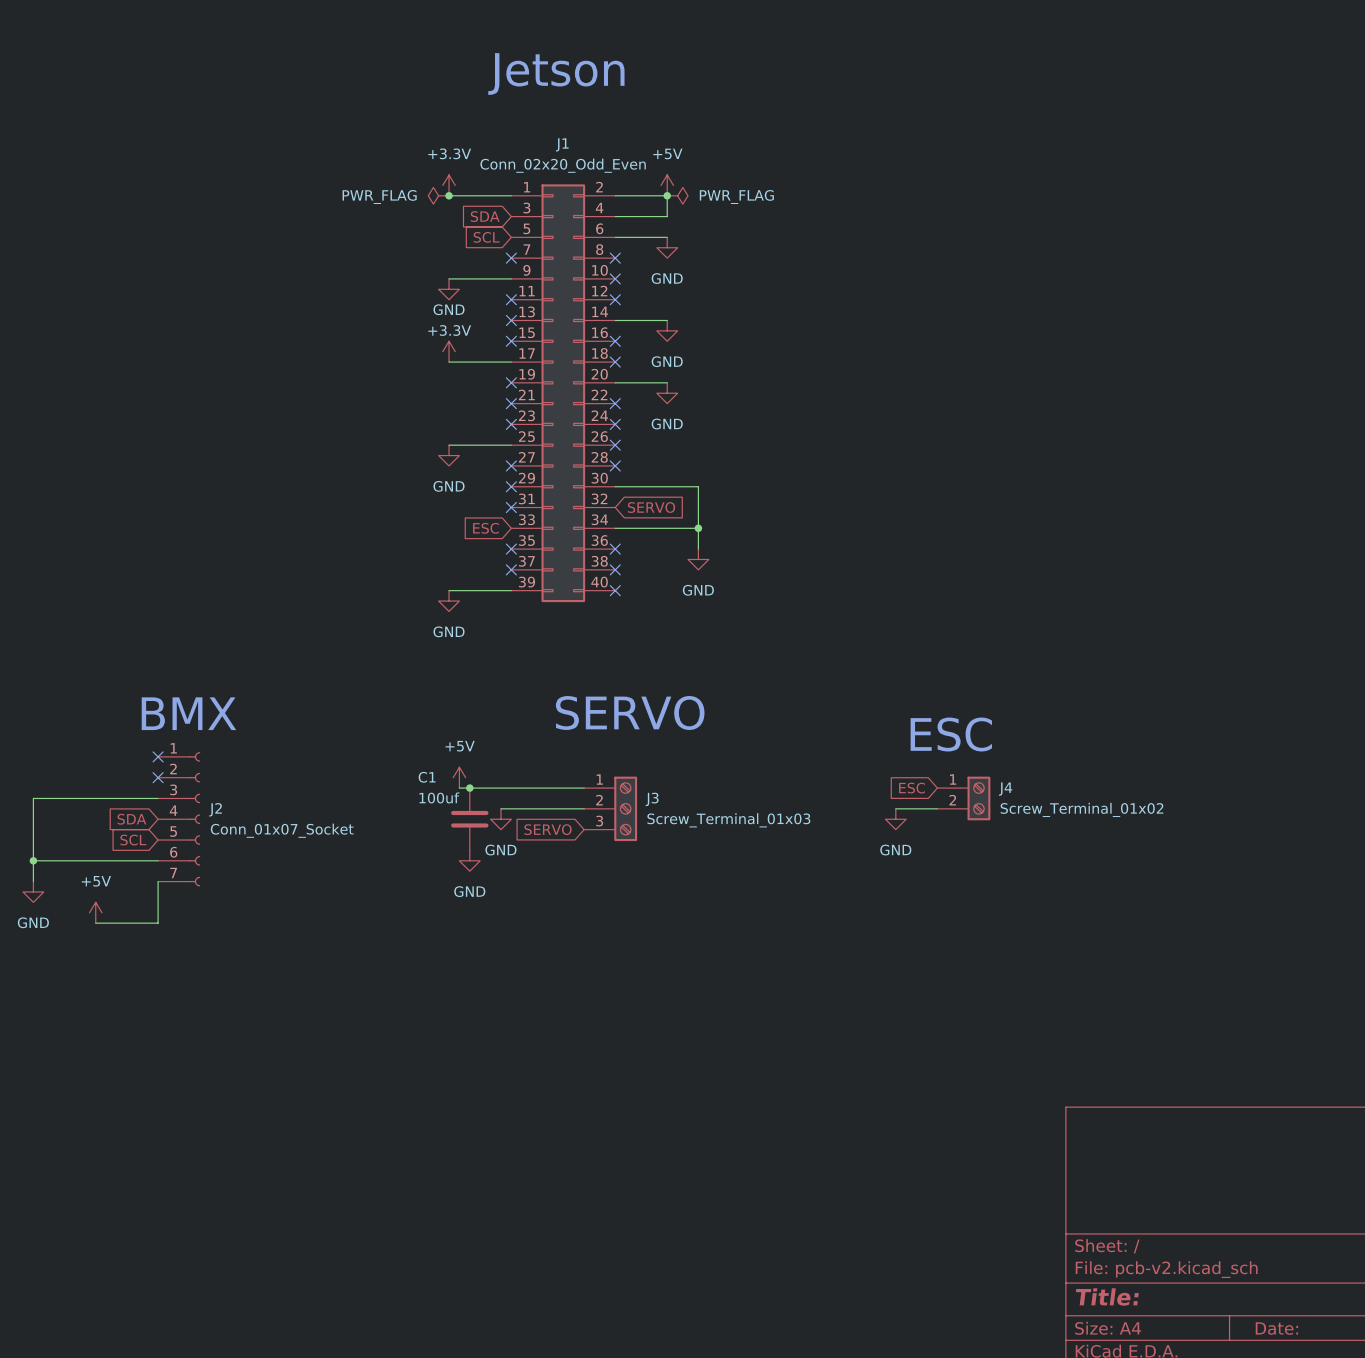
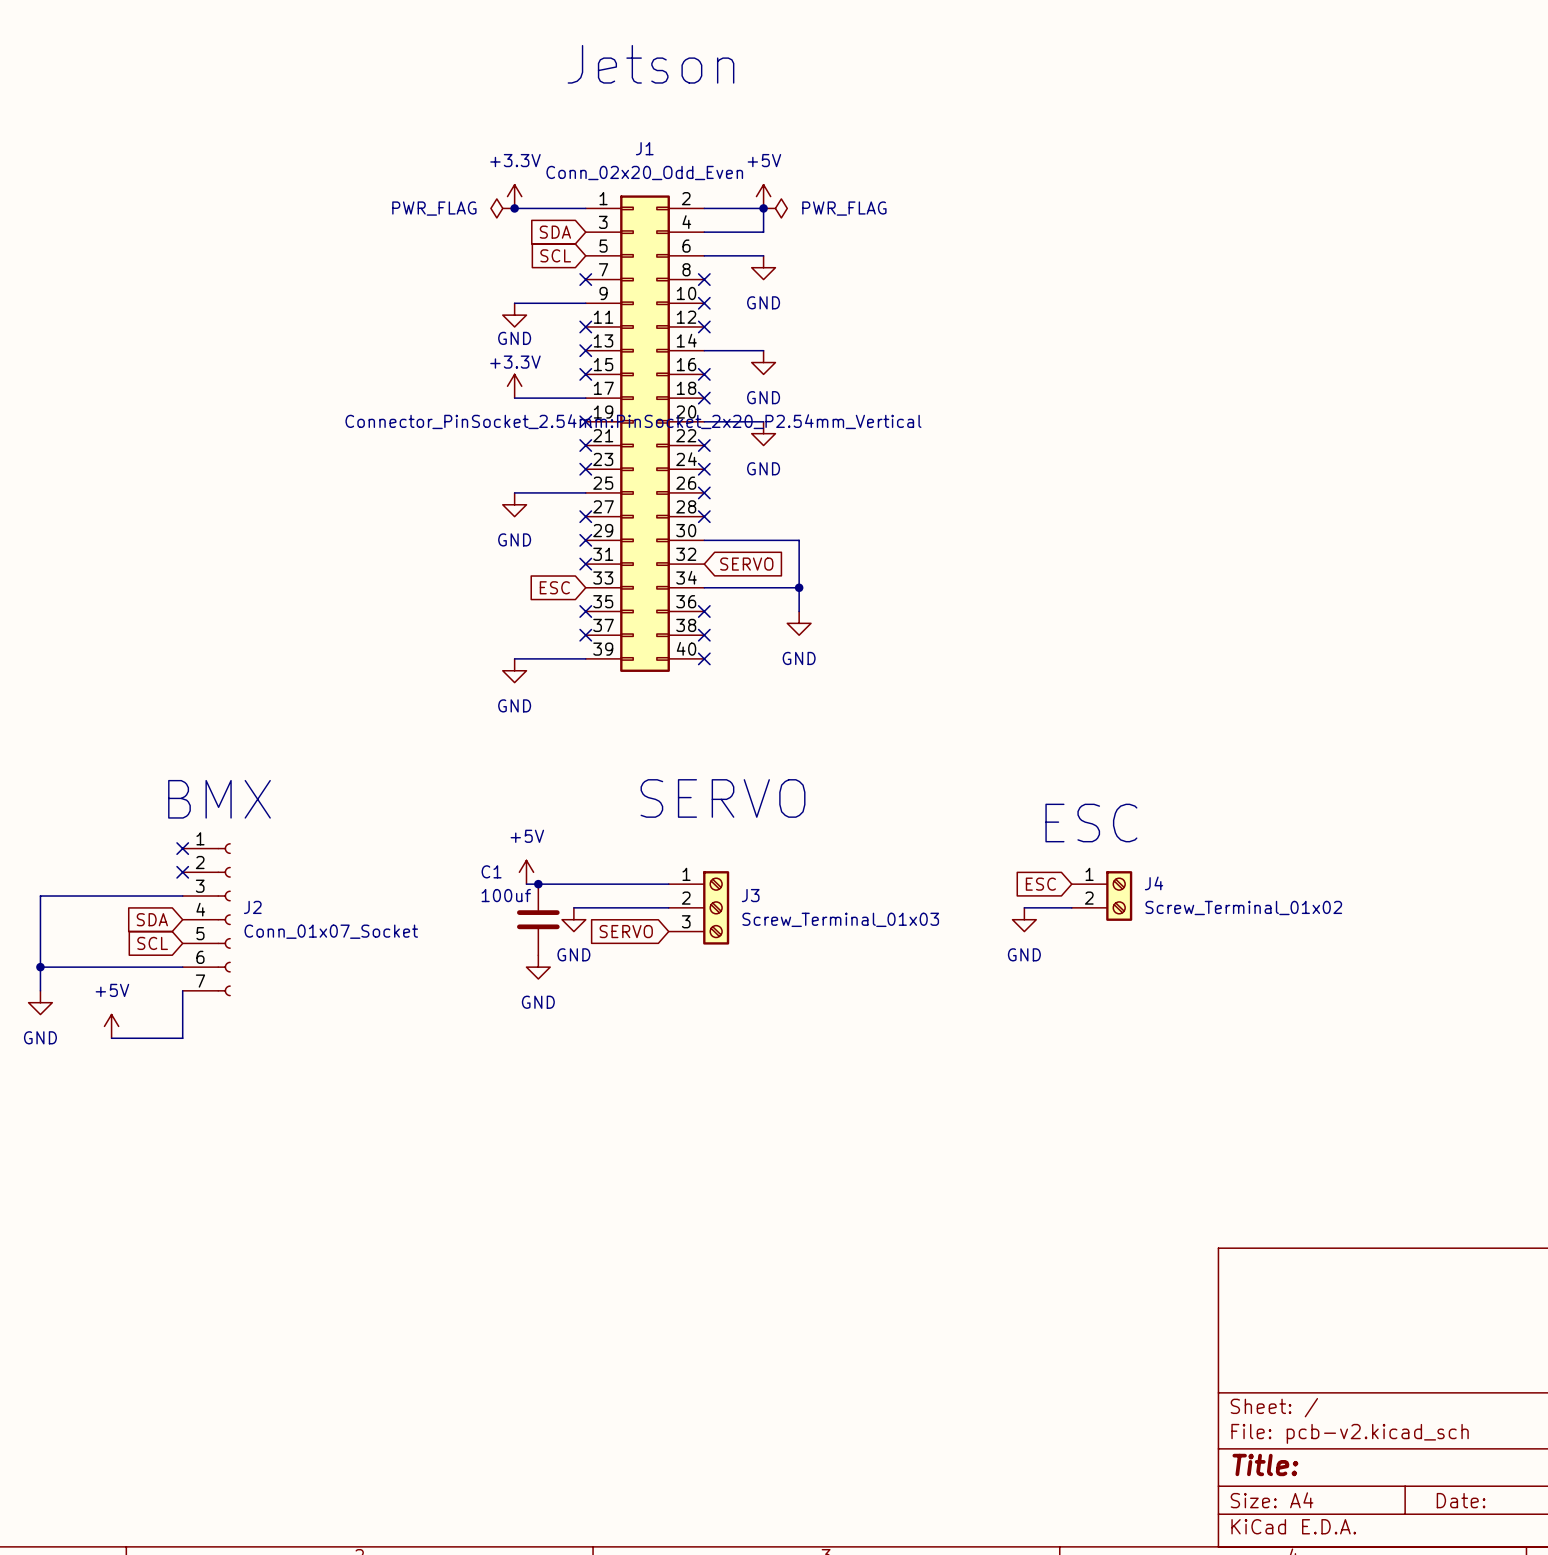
J1 text: none -> Connector_PinSocket_2.54mm:PinSocket_2x20_P2.54mm_Vertical (633, 421)

